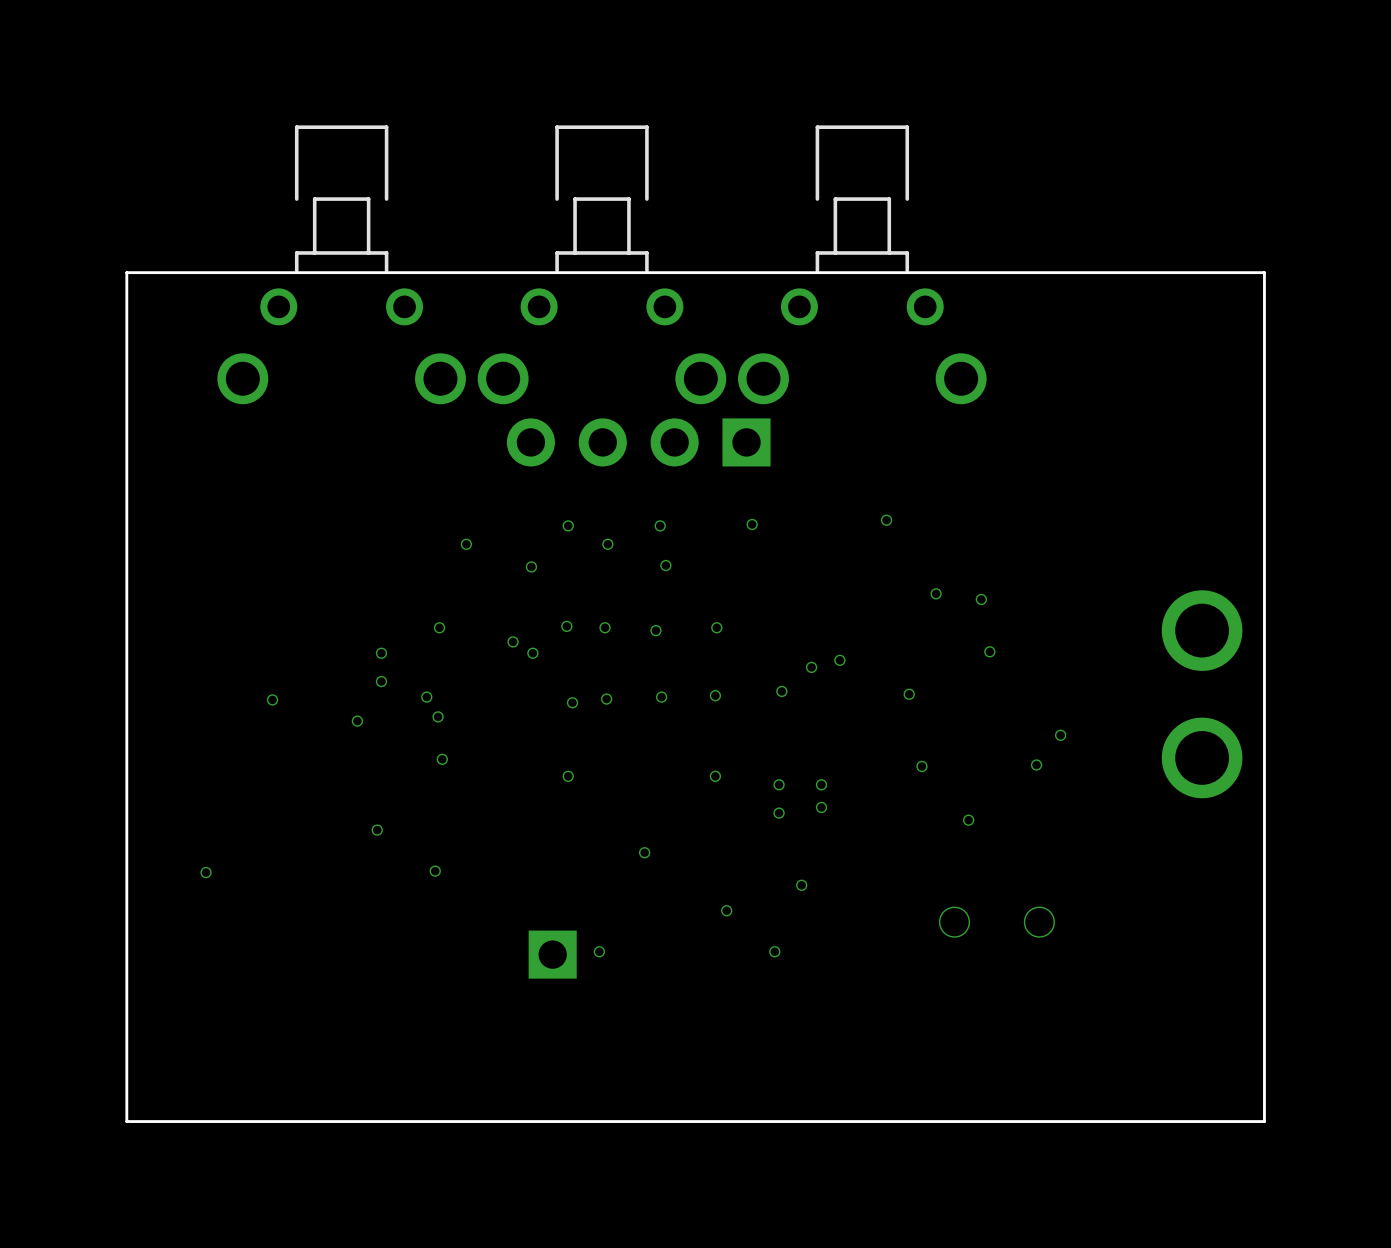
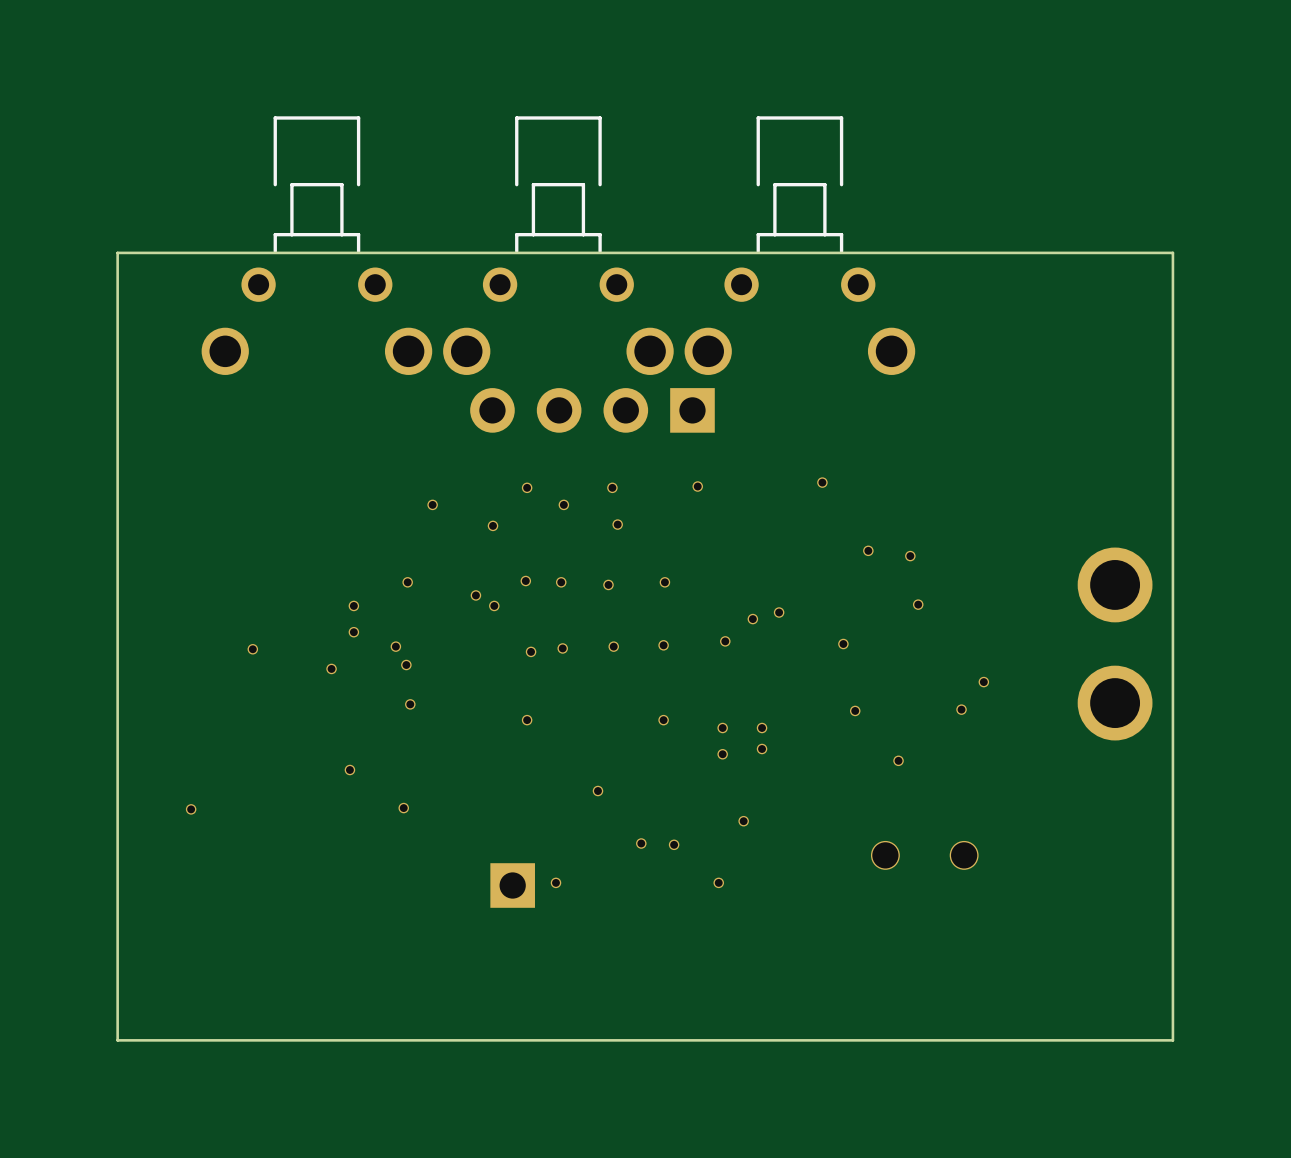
part: none -> (641, 843)

